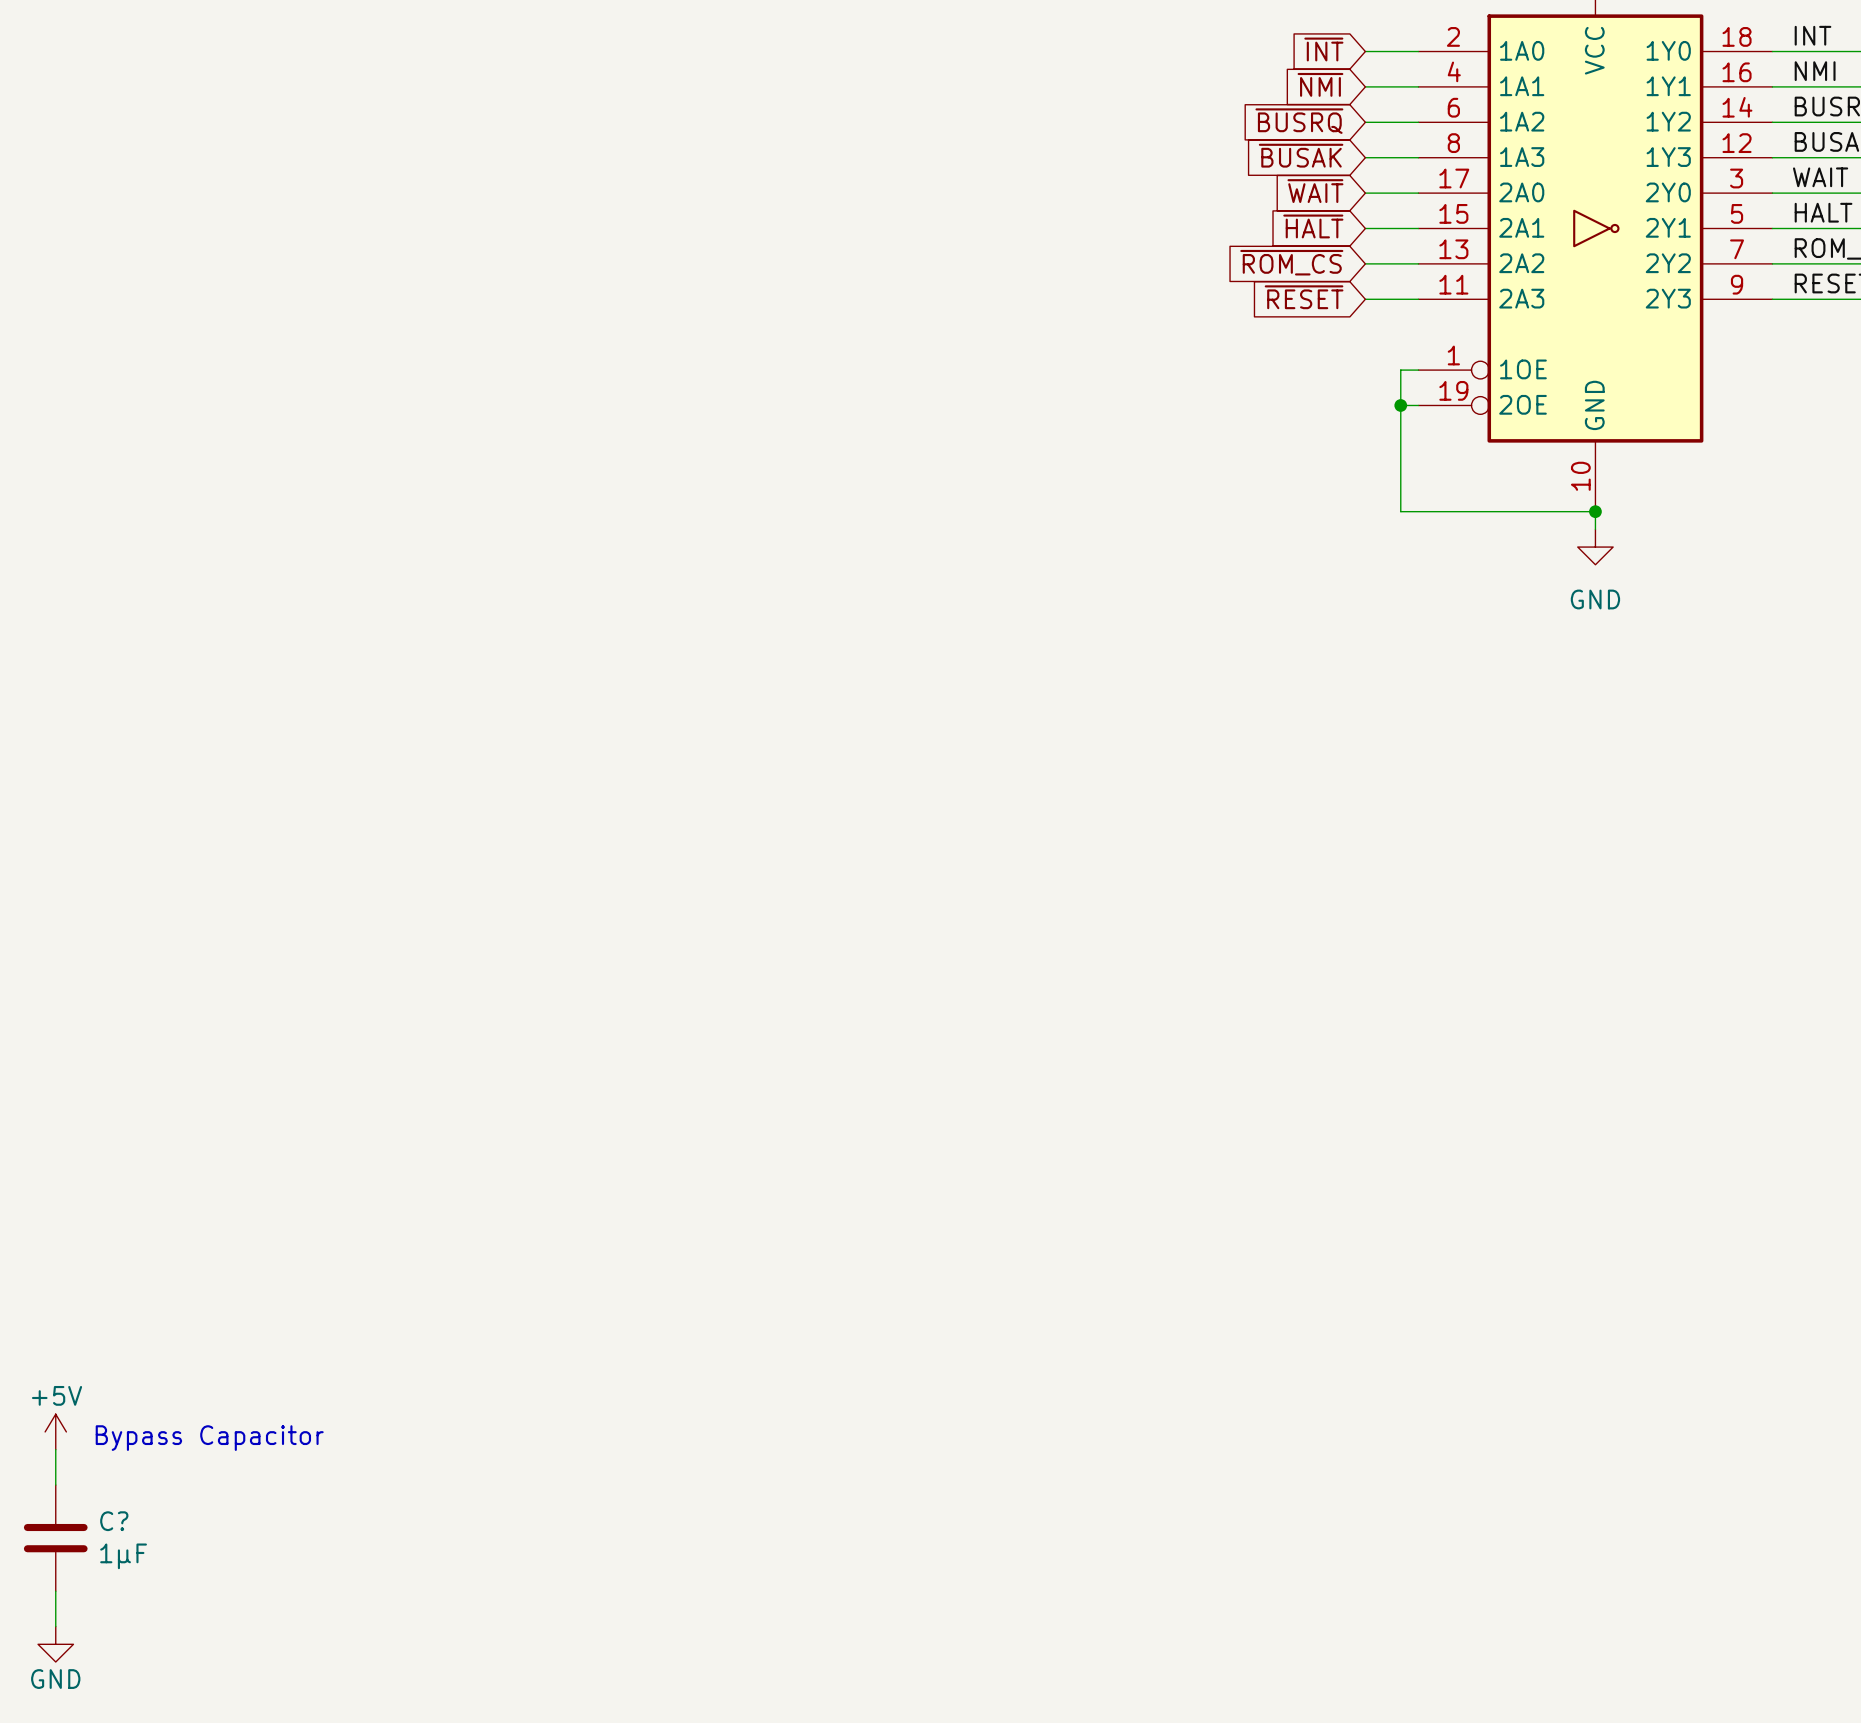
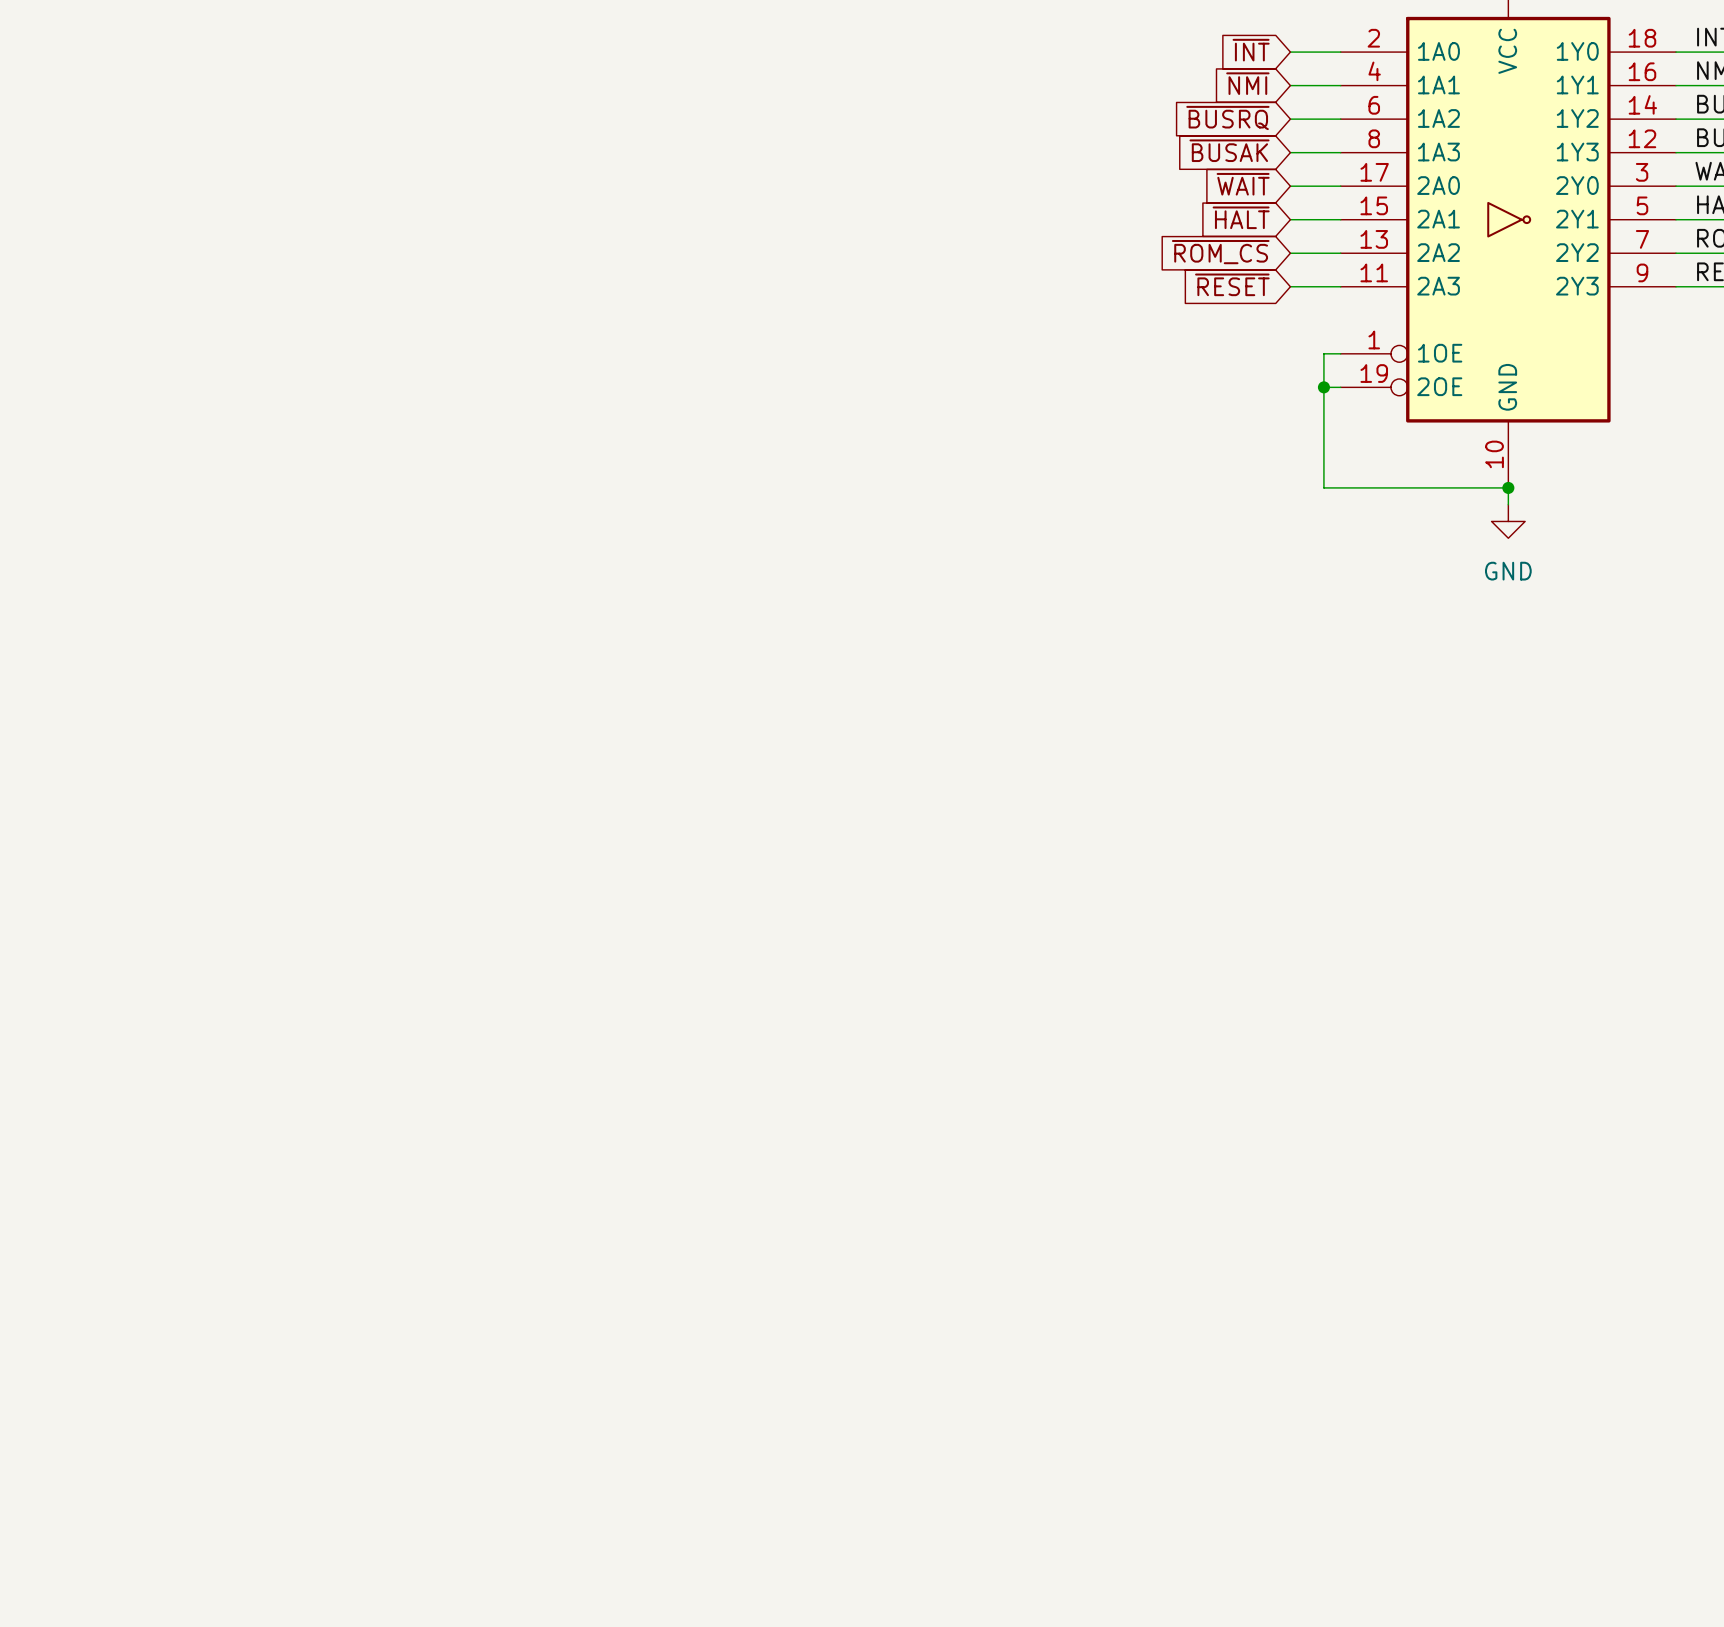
power symbol: +5V (55, 1431) -> none
text: Bypass Capacitor (209, 1438) -> none
wire: (55, 1449) (55, 1485) -> none
C?: 1µF (55, 1538) -> none
wire: (55, 1591) (55, 1626) -> none
power symbol: GND (55, 1644) -> none

